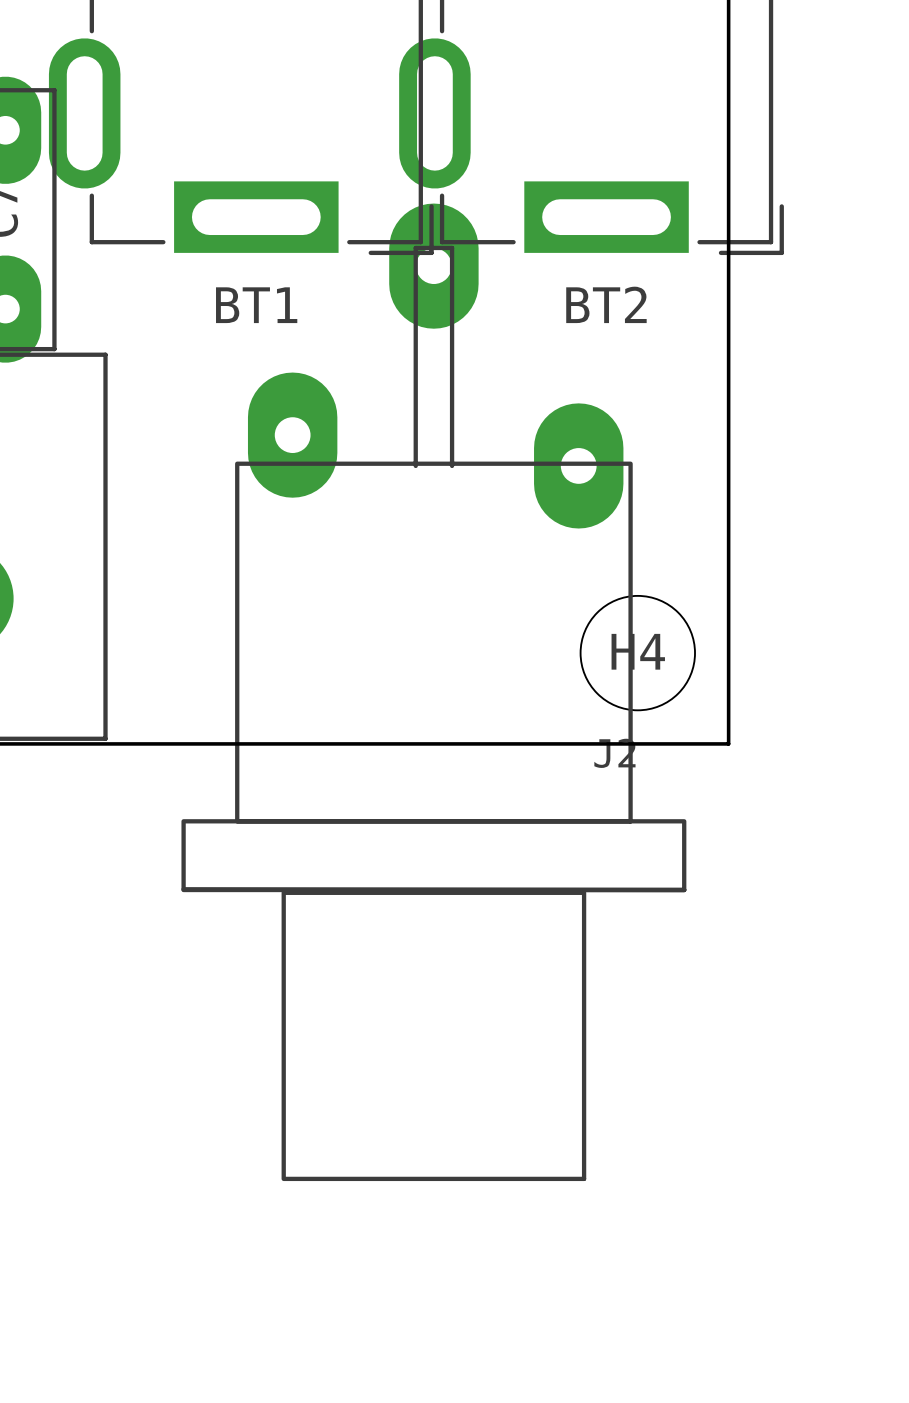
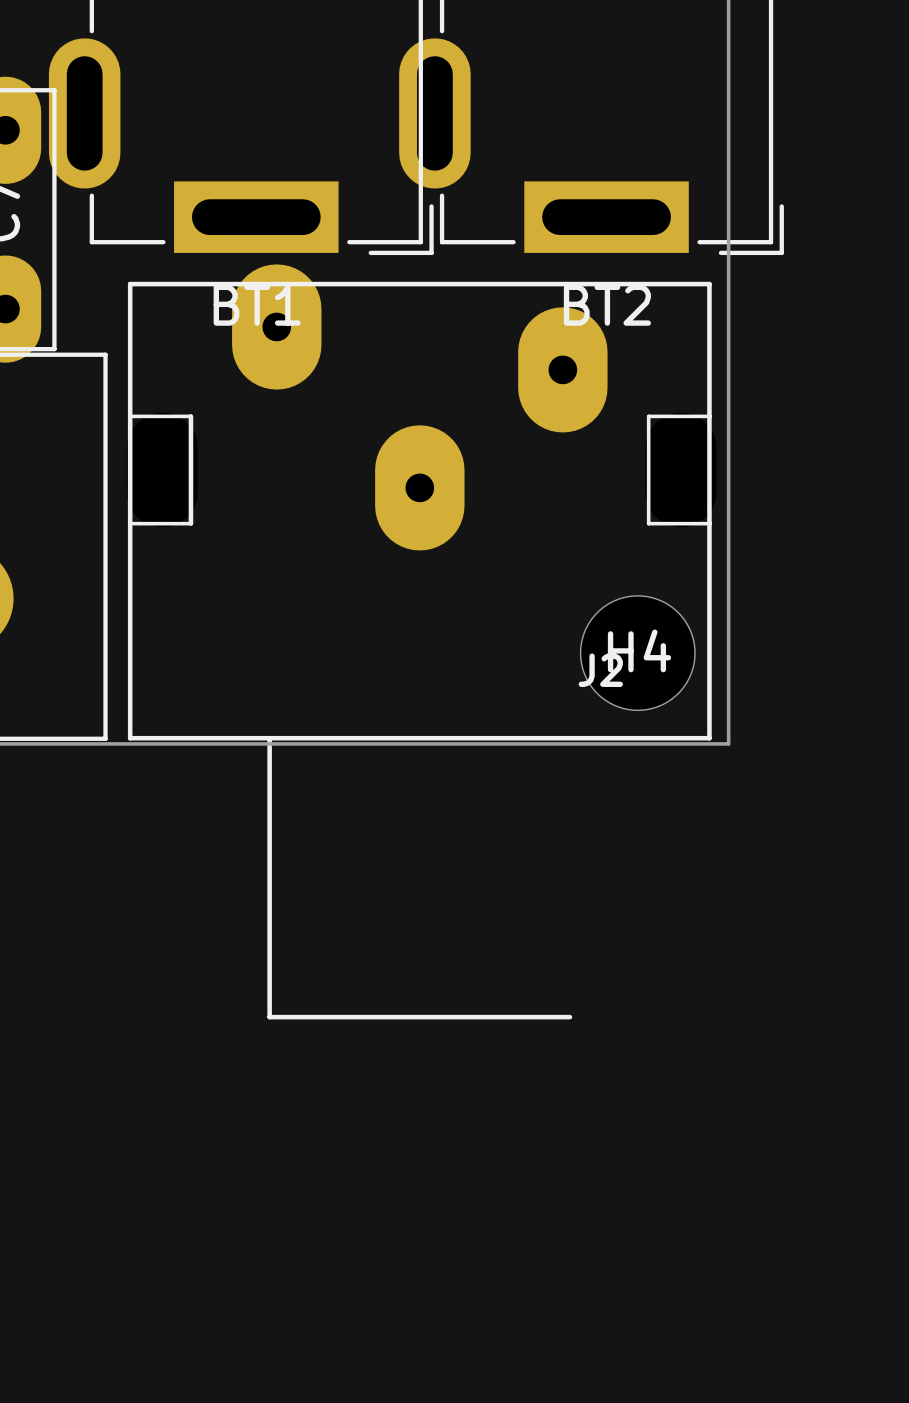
J2 footprint: [181, 203, 687, 1182] -> [126, 264, 717, 1020]

